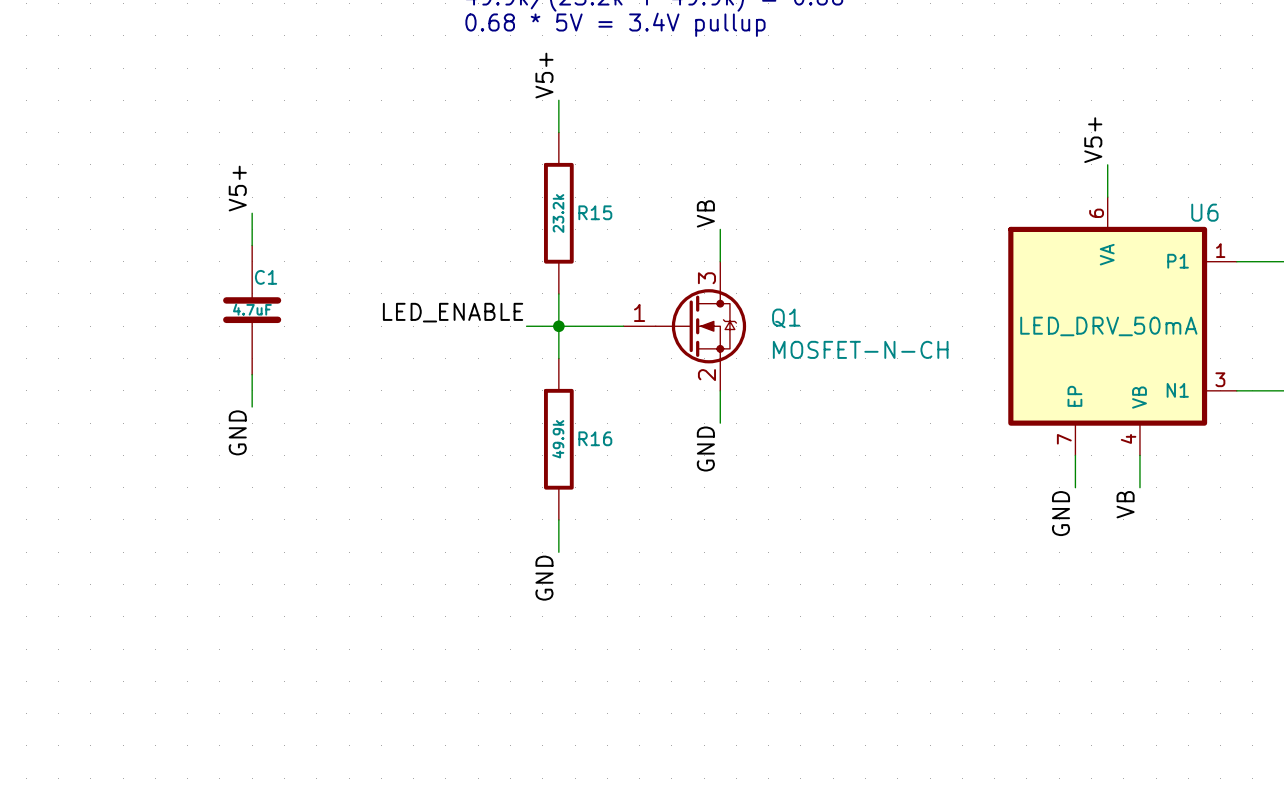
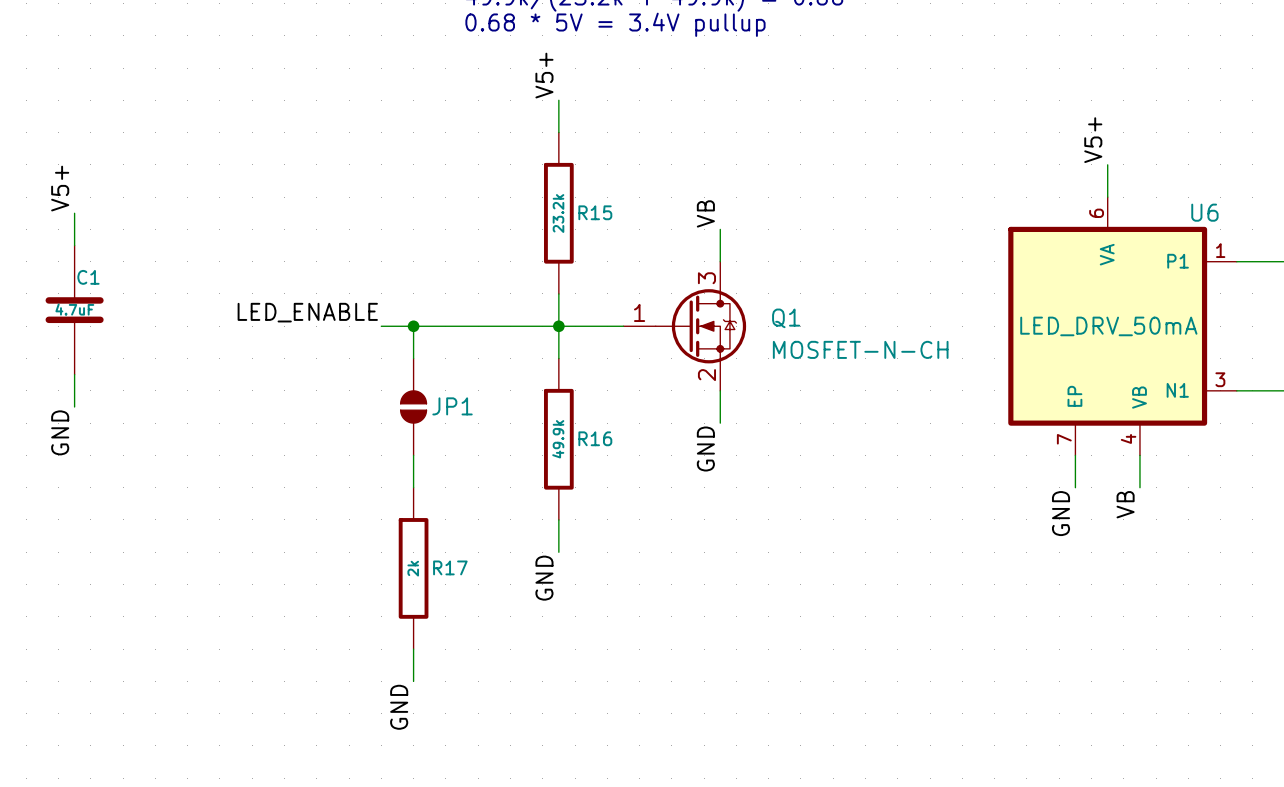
label position: V5+ (237, 188) -> V5+ (60, 188)
wire: (252, 213) (252, 245) -> (74, 213) (74, 245)
C1 position: (252, 310) -> (74, 310)
label position: LED_ENABLE (453, 312) -> LED_ENABLE (307, 312)
wire: none -> (381, 326) (526, 326)
wire: none -> (413, 326) (413, 358)
junction: none -> (413, 326)
wire: (252, 374) (252, 406) -> (74, 374) (74, 406)
JP1: none -> (413, 406)
label: none -> GND (60, 432)
label: GND (237, 432) -> none
wire: none -> (413, 455) (413, 487)
R17: none -> 2k (413, 568)
wire: none -> (413, 649) (413, 681)
label: none -> GND (399, 707)

